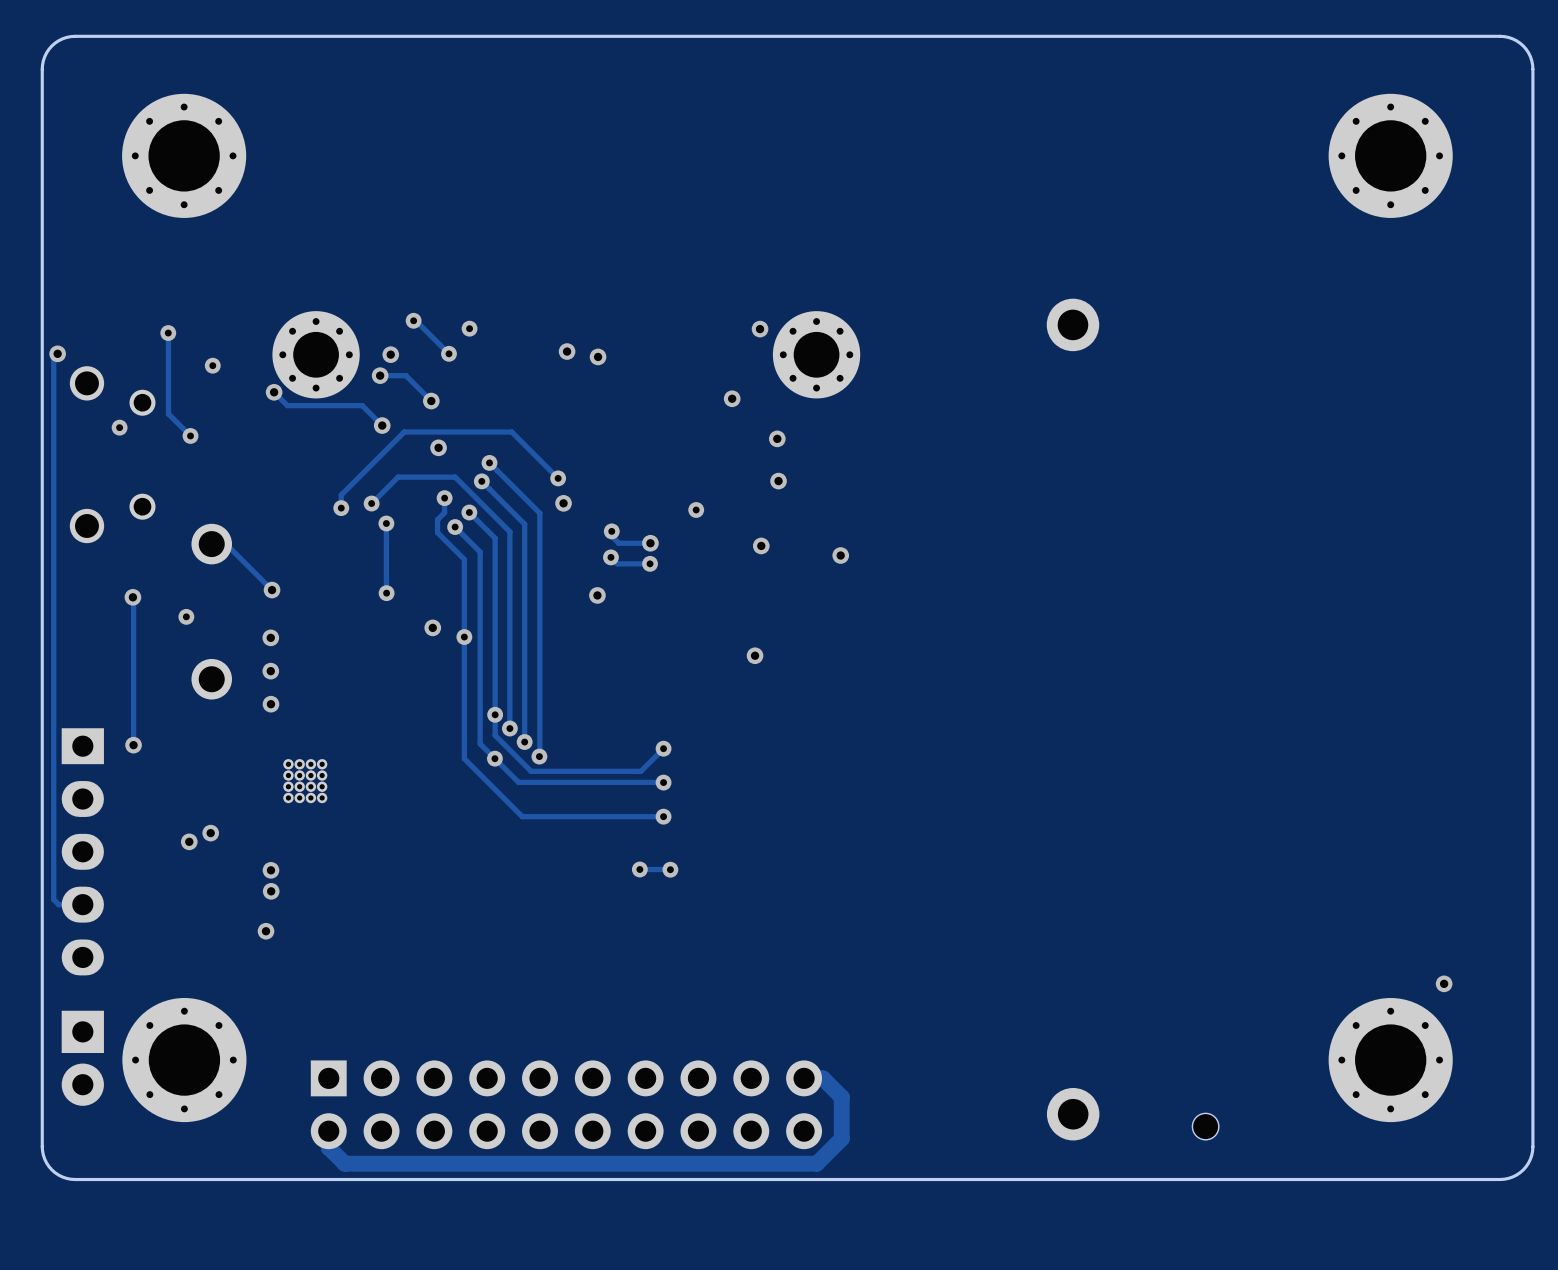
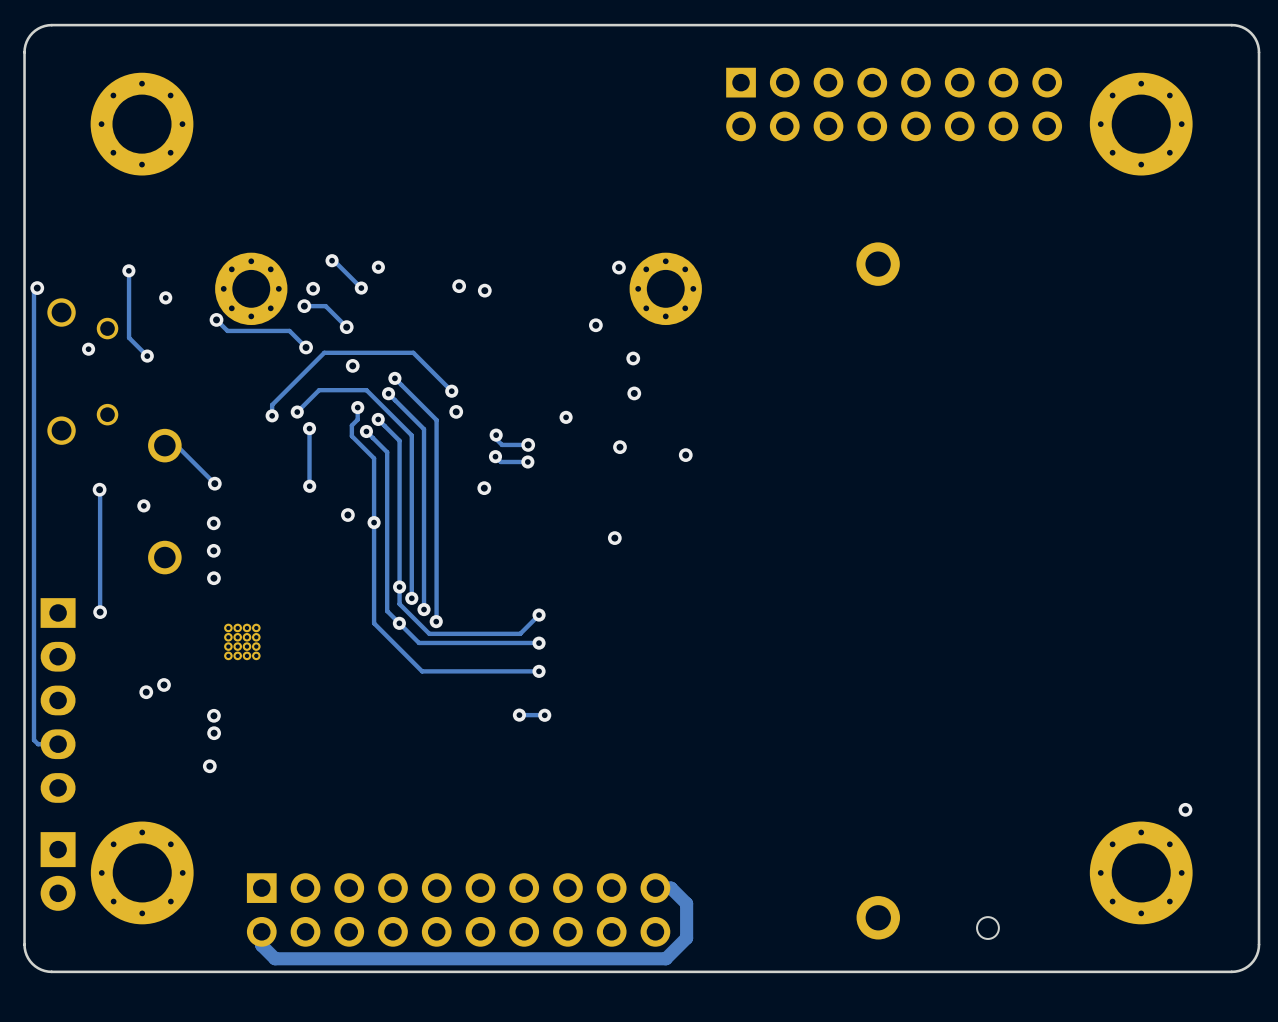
part: none -> (894, 104)

